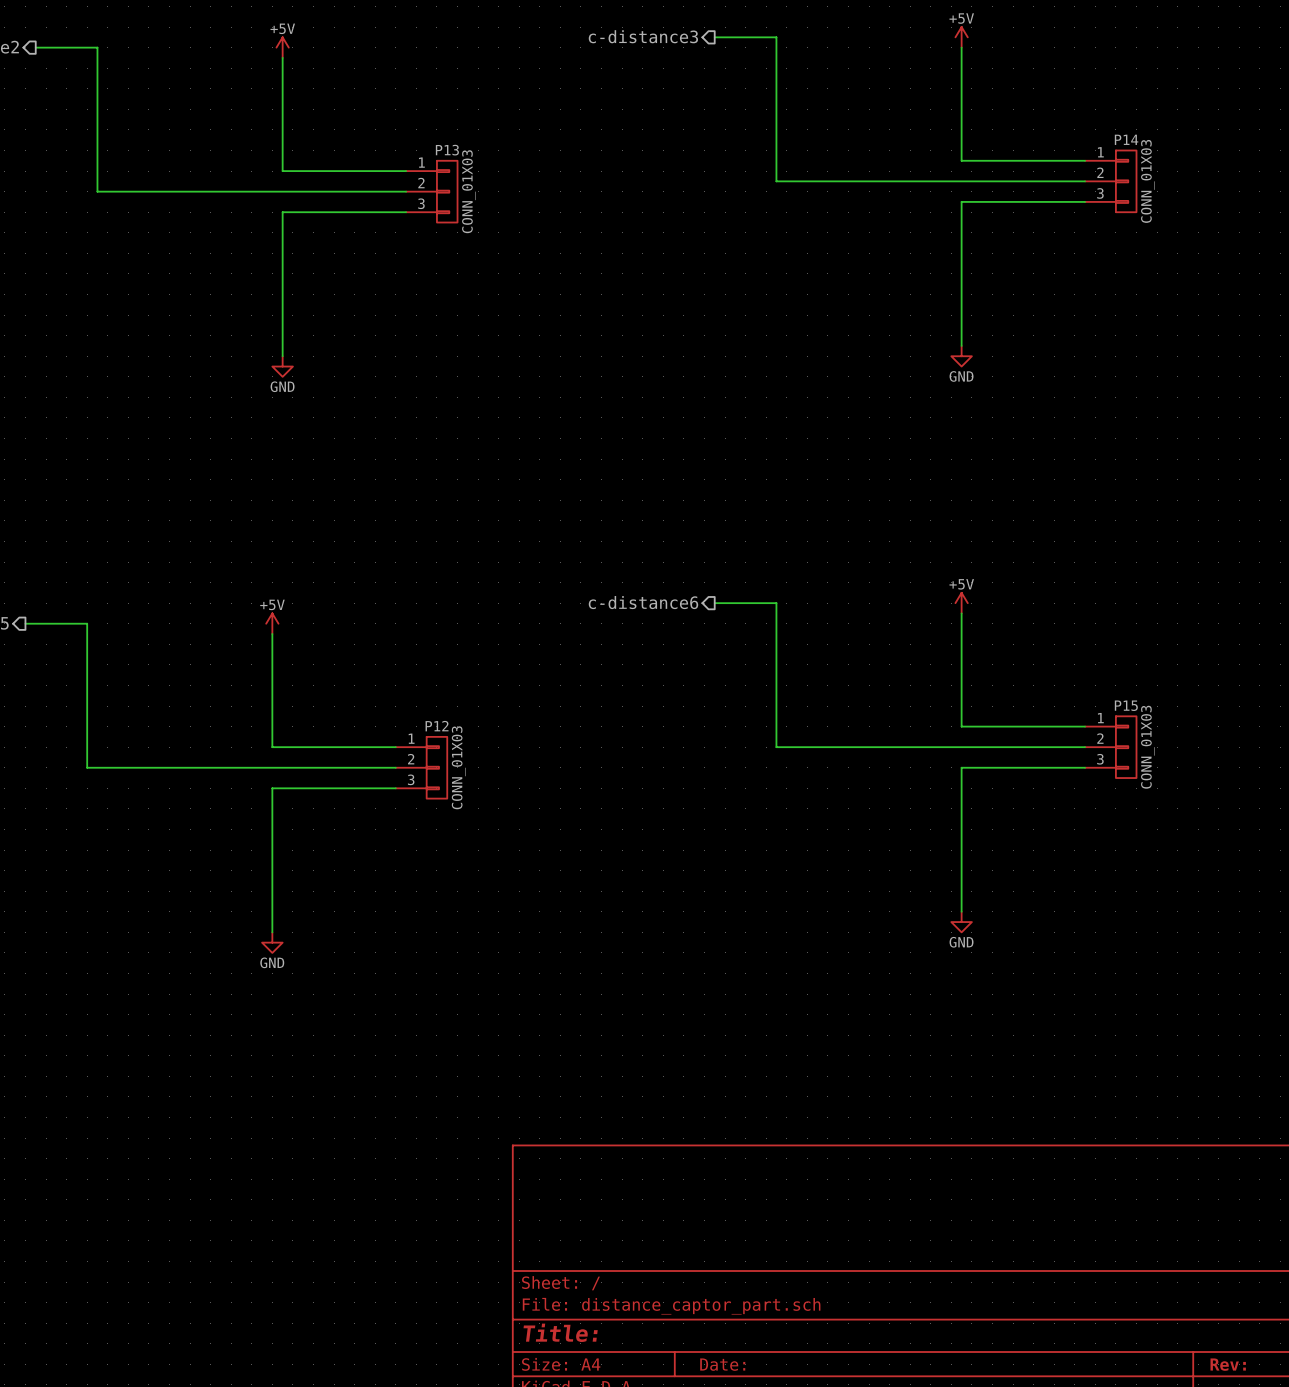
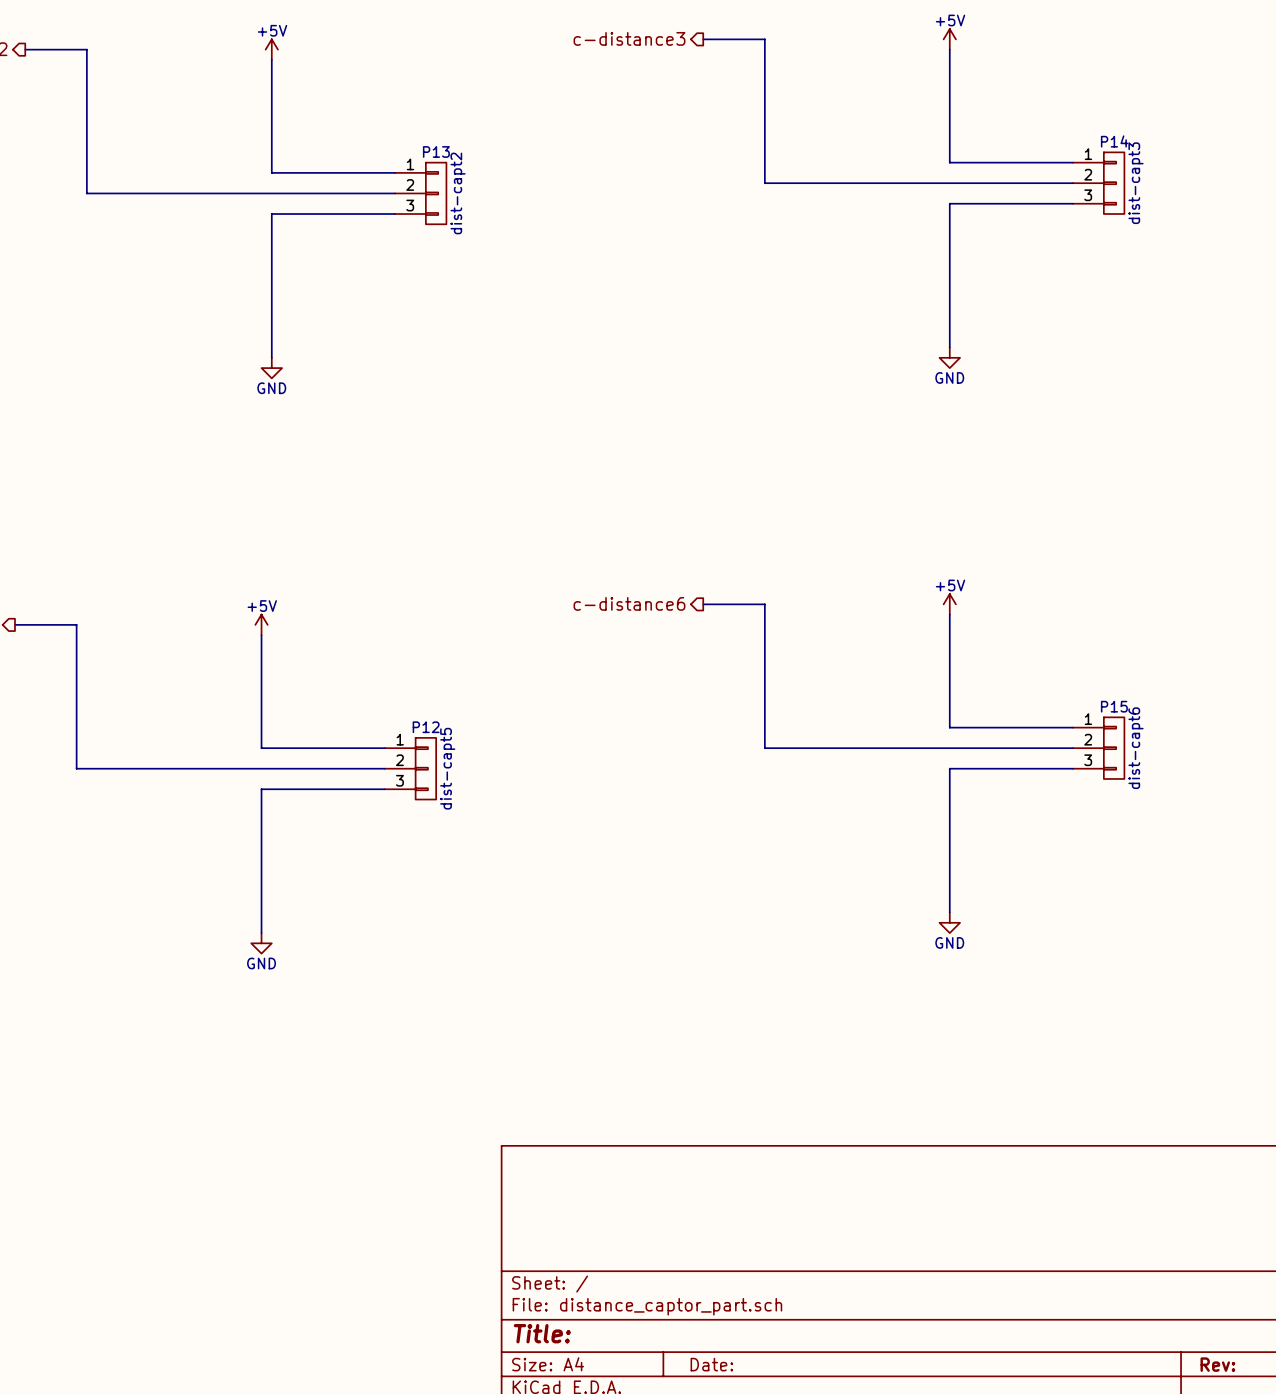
P14 value: CONN_01X03 (1147, 181) -> dist-capt3 (1136, 183)
P13 value: CONN_01X03 (469, 191) -> dist-capt2 (458, 193)
P15 value: CONN_01X03 (1147, 747) -> dist-capt6 (1136, 748)
P12 value: CONN_01X03 (458, 767) -> dist-capt5 (447, 768)

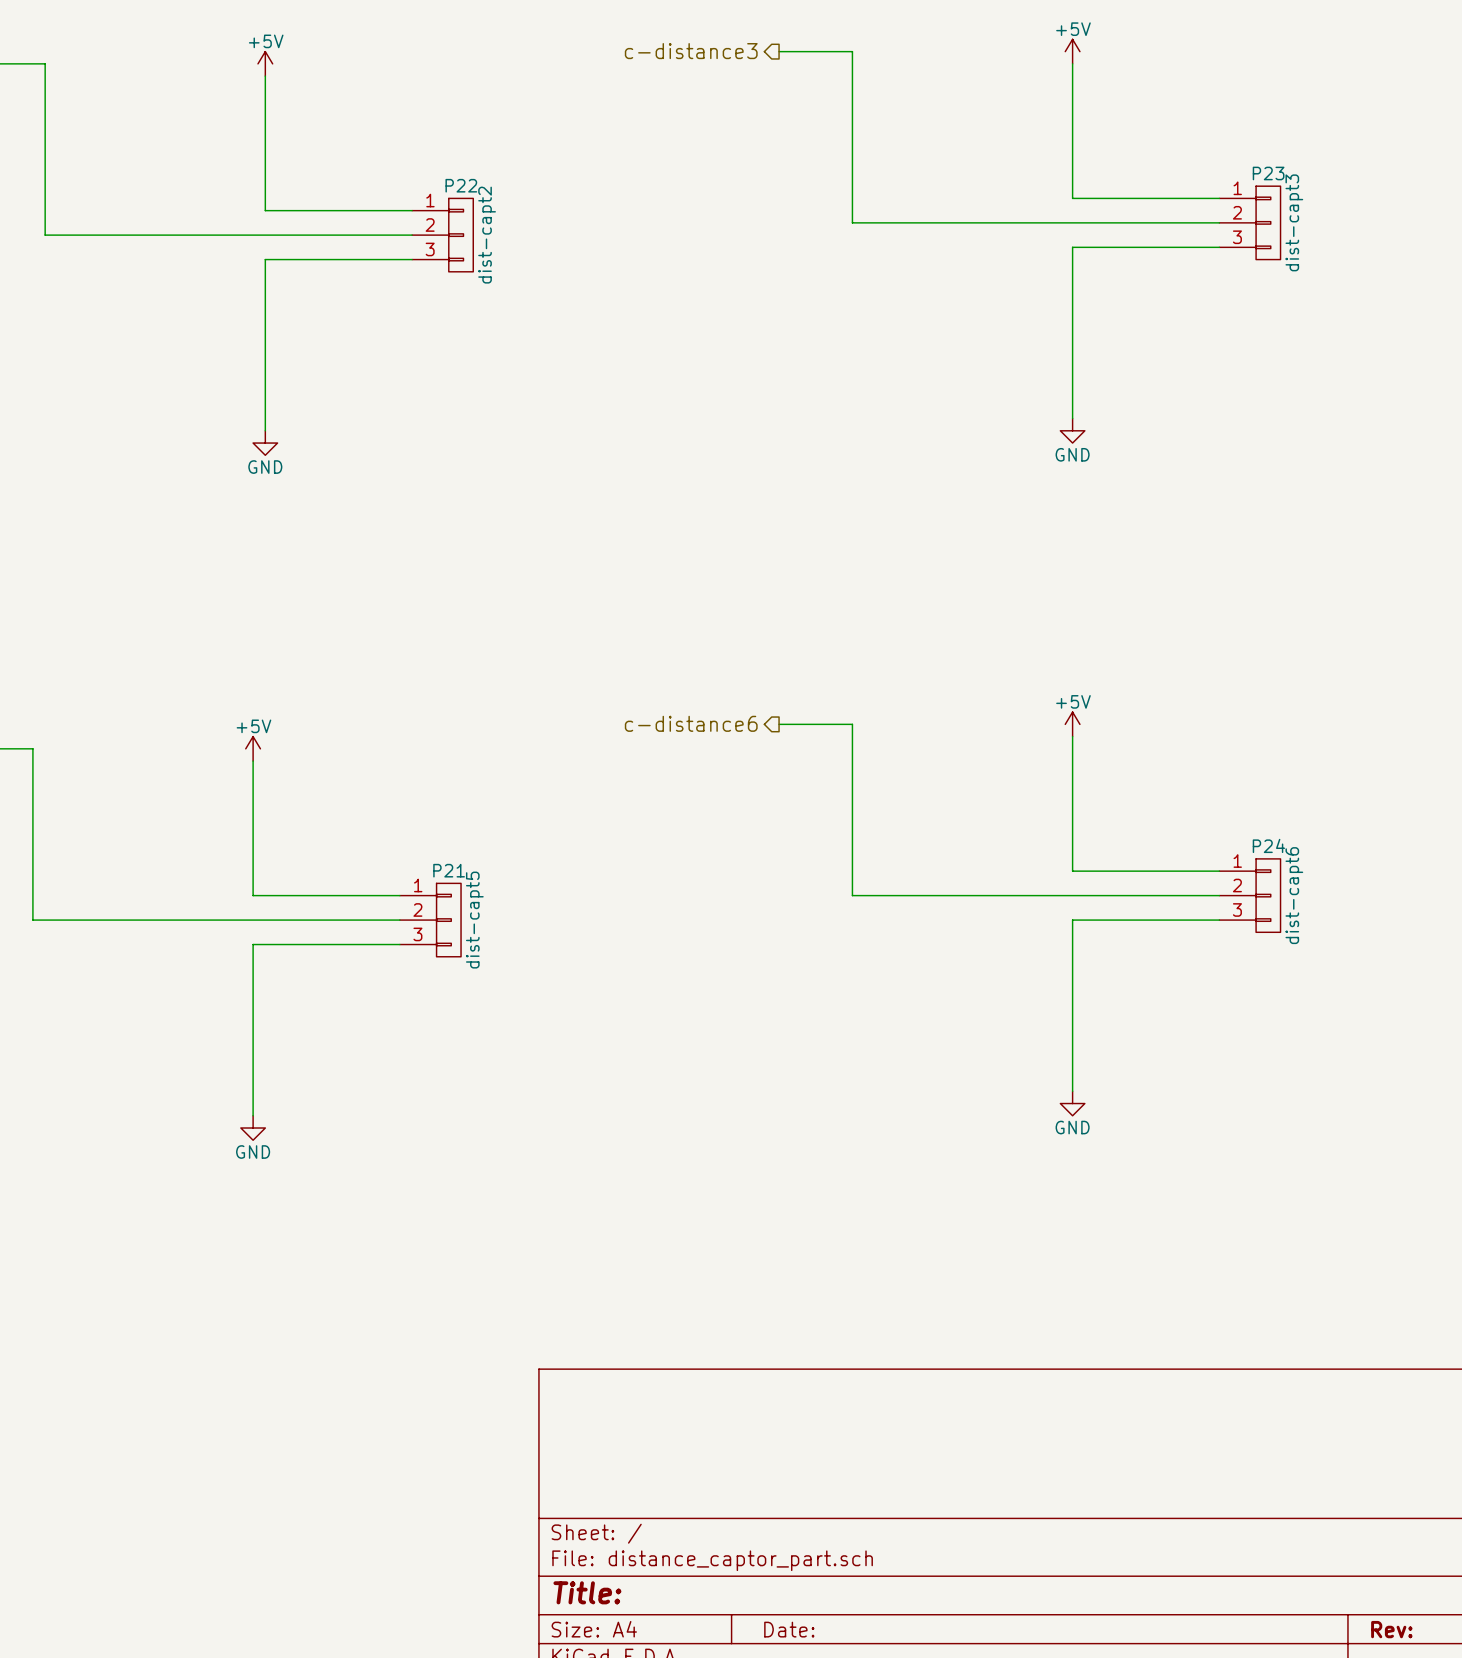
P14 name: P14 (1114, 141) -> P23 (1268, 173)
P13 name: P13 (436, 151) -> P22 (461, 185)
P15 name: P15 (1114, 706) -> P24 (1268, 845)
P12 name: P12 (426, 727) -> P21 (449, 870)

